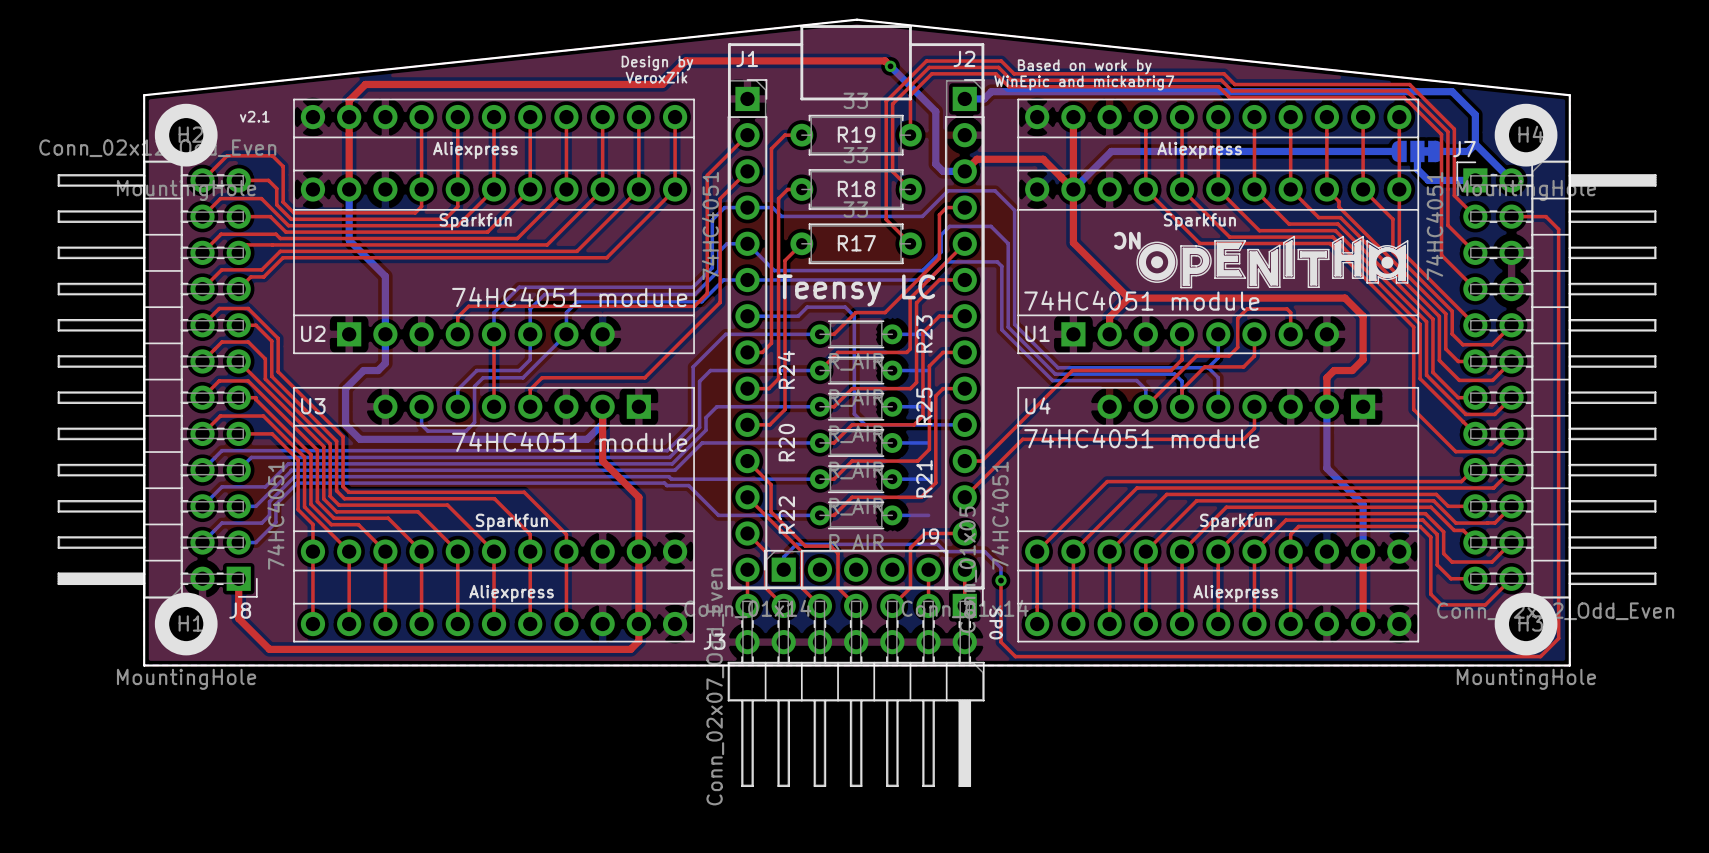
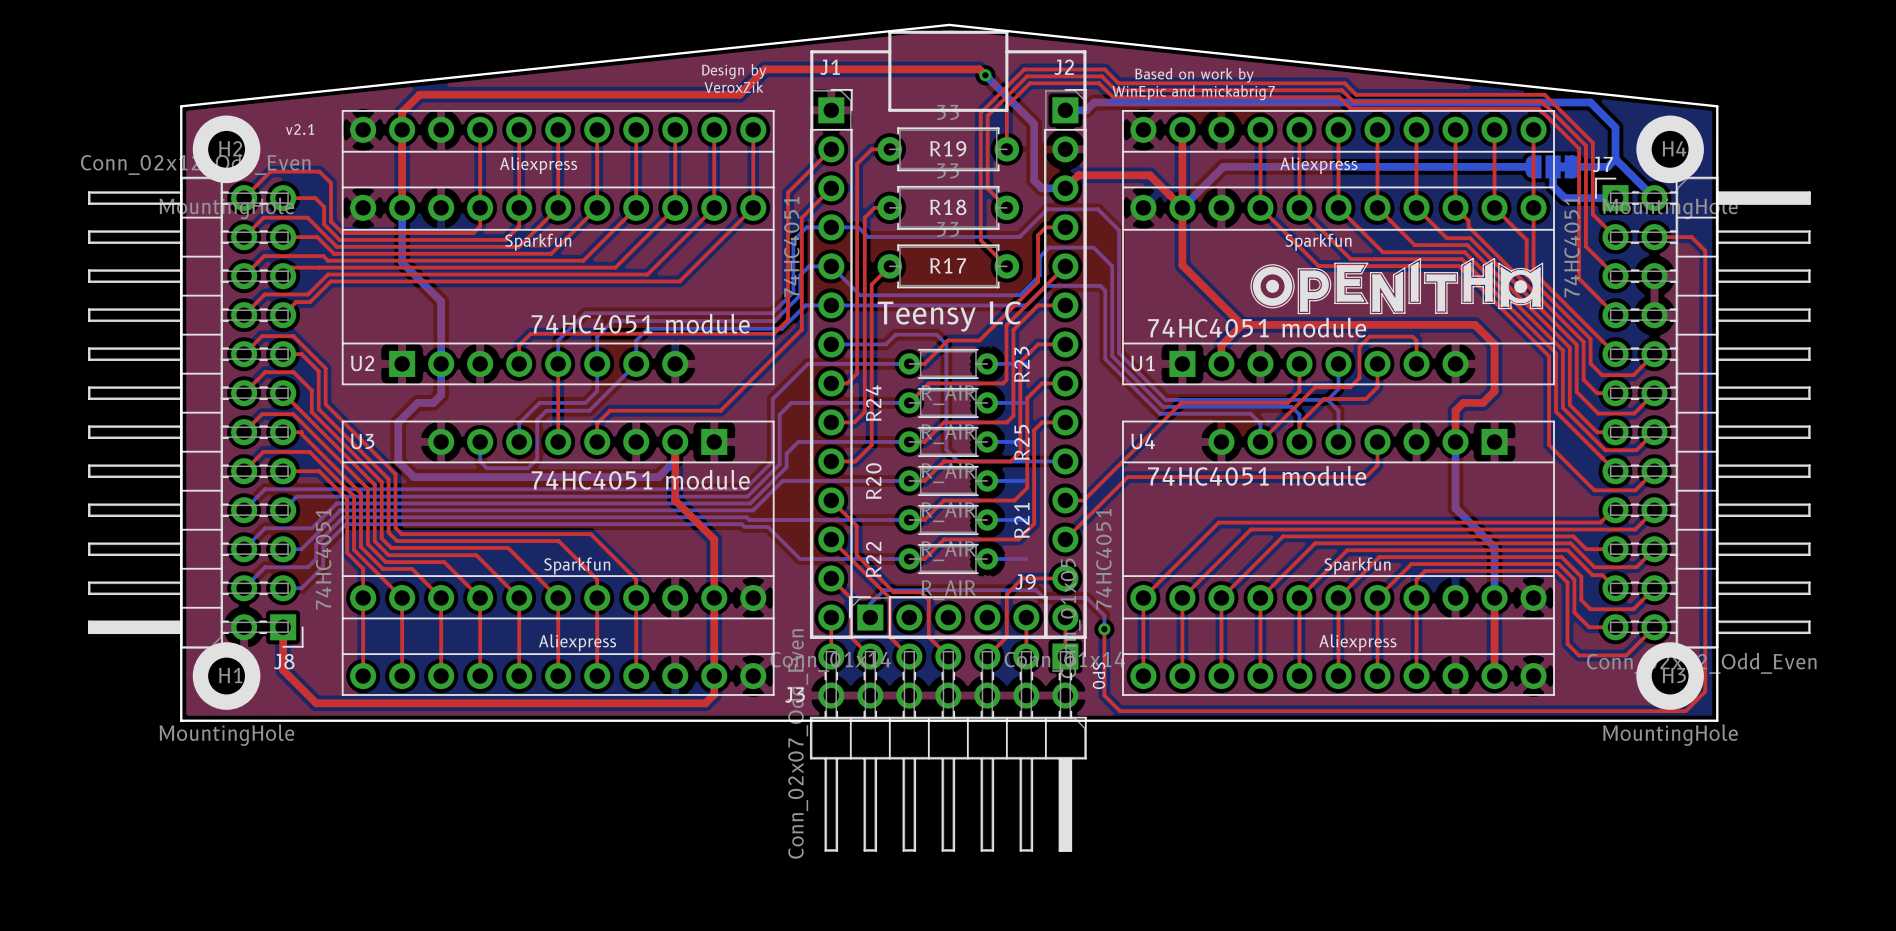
text: NC (1127, 240) -> none

